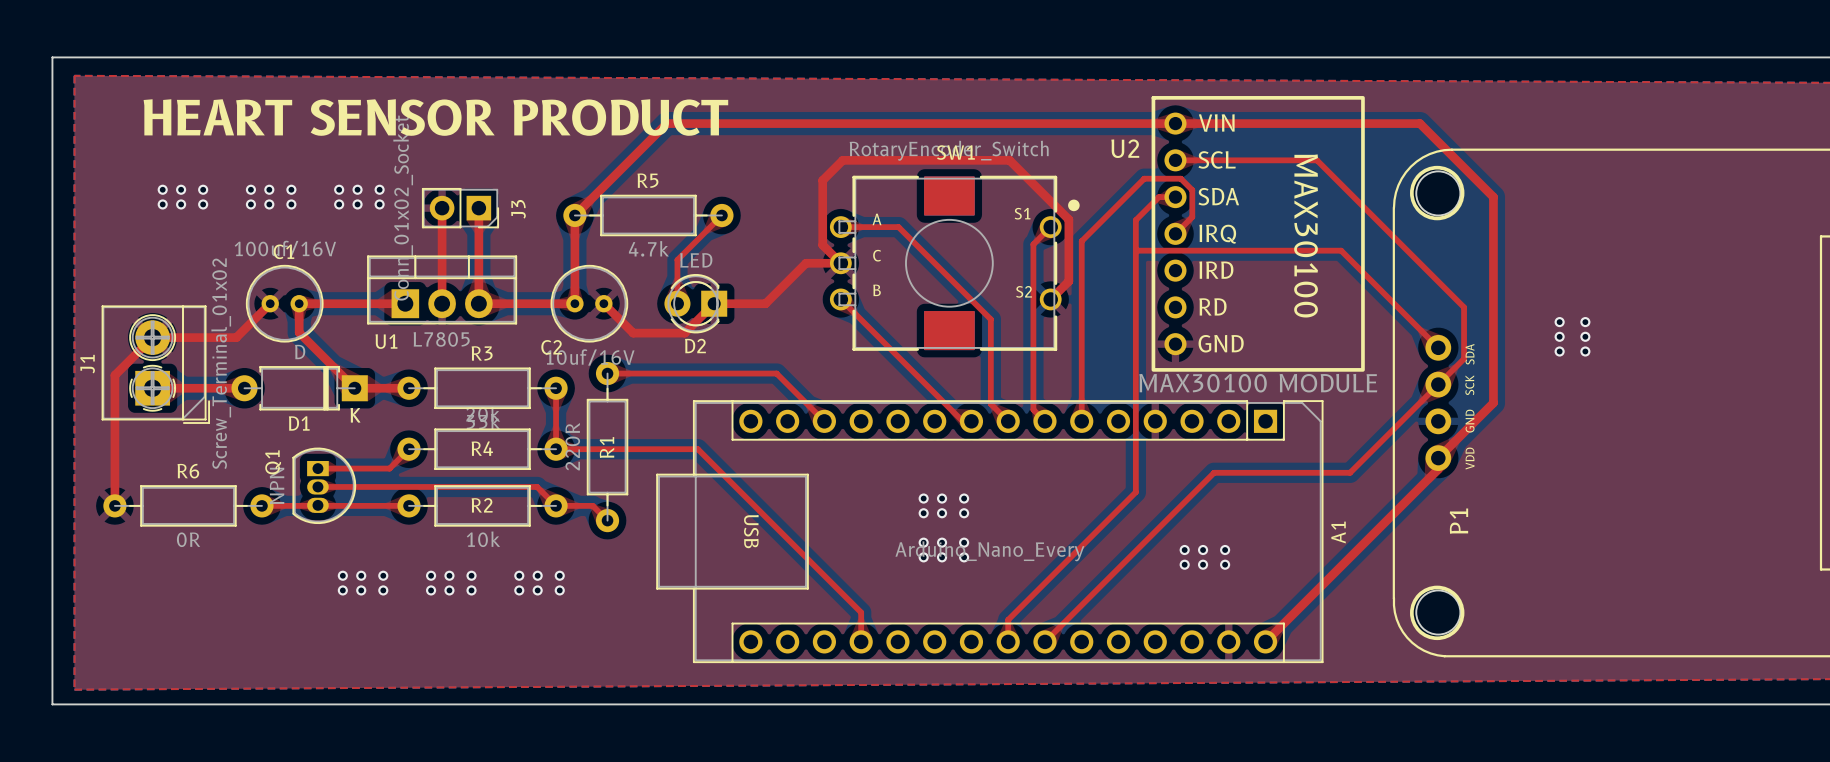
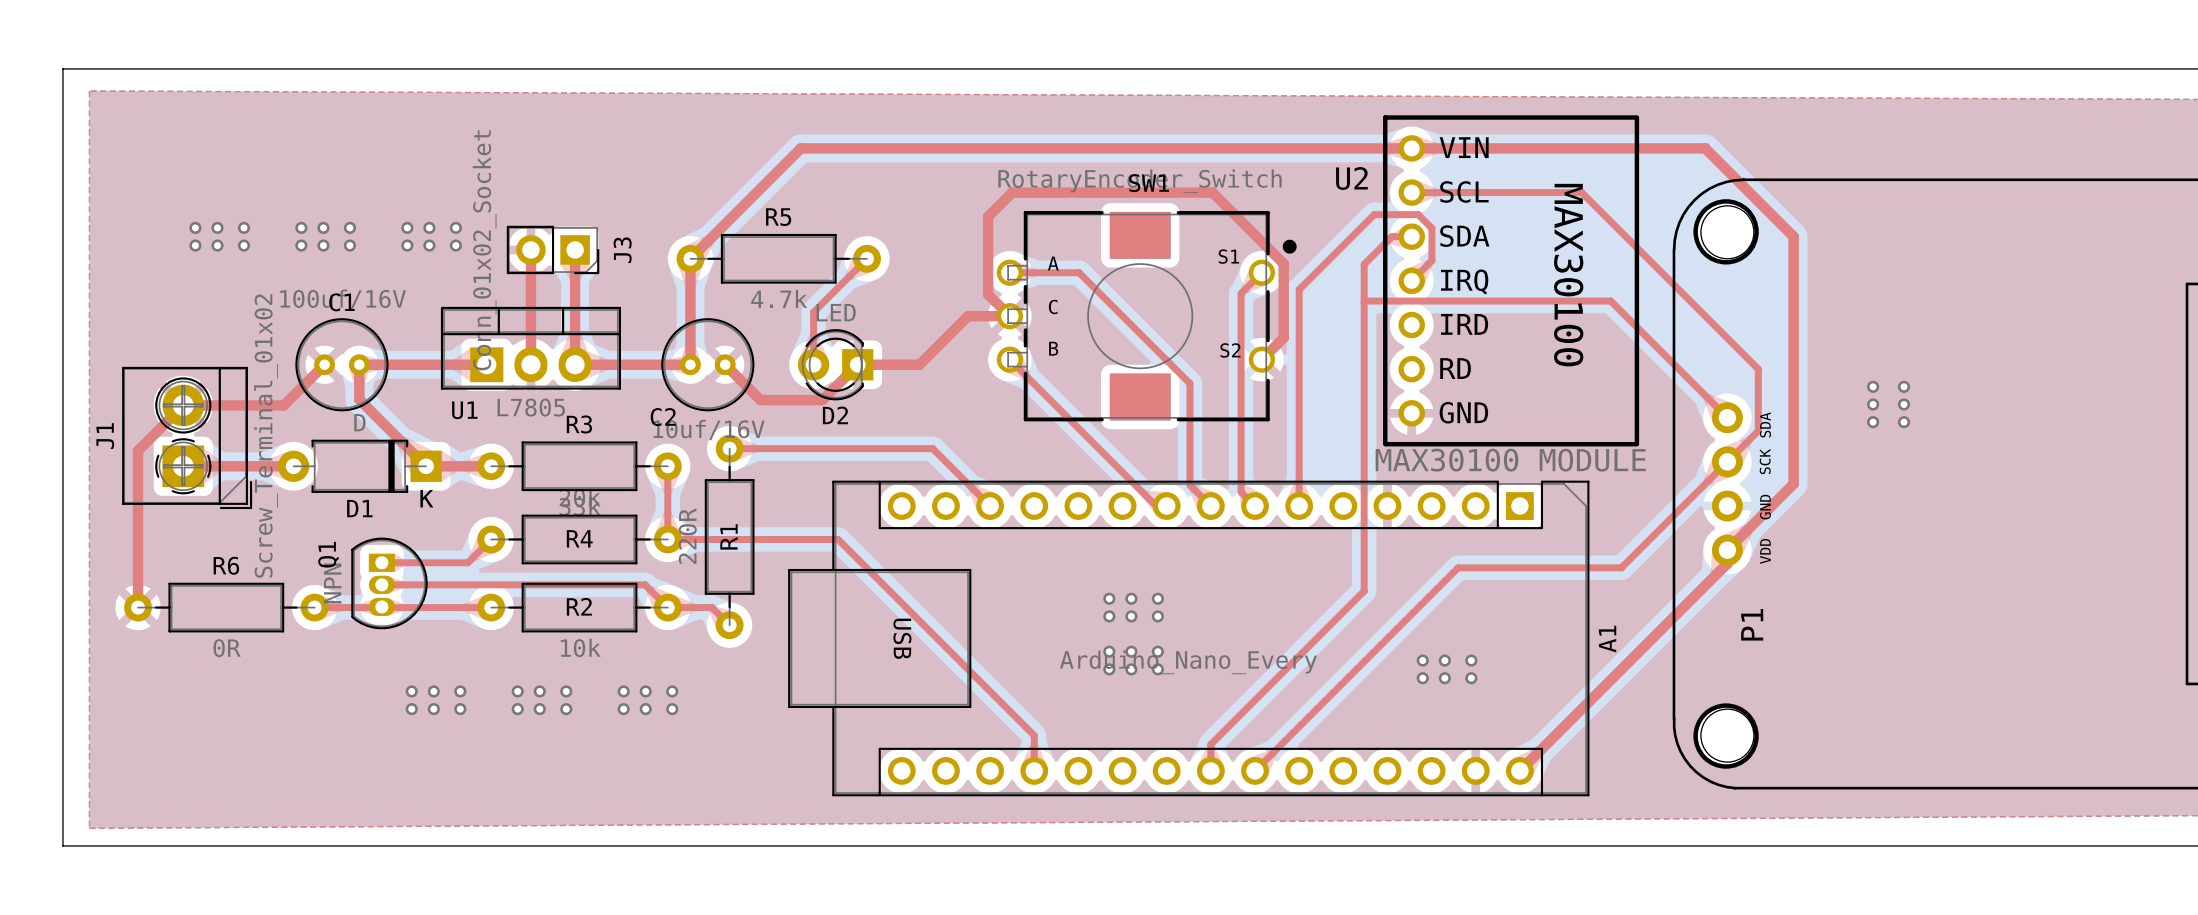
text: HEART SENSOR PRODUCT (435, 117) -> none

